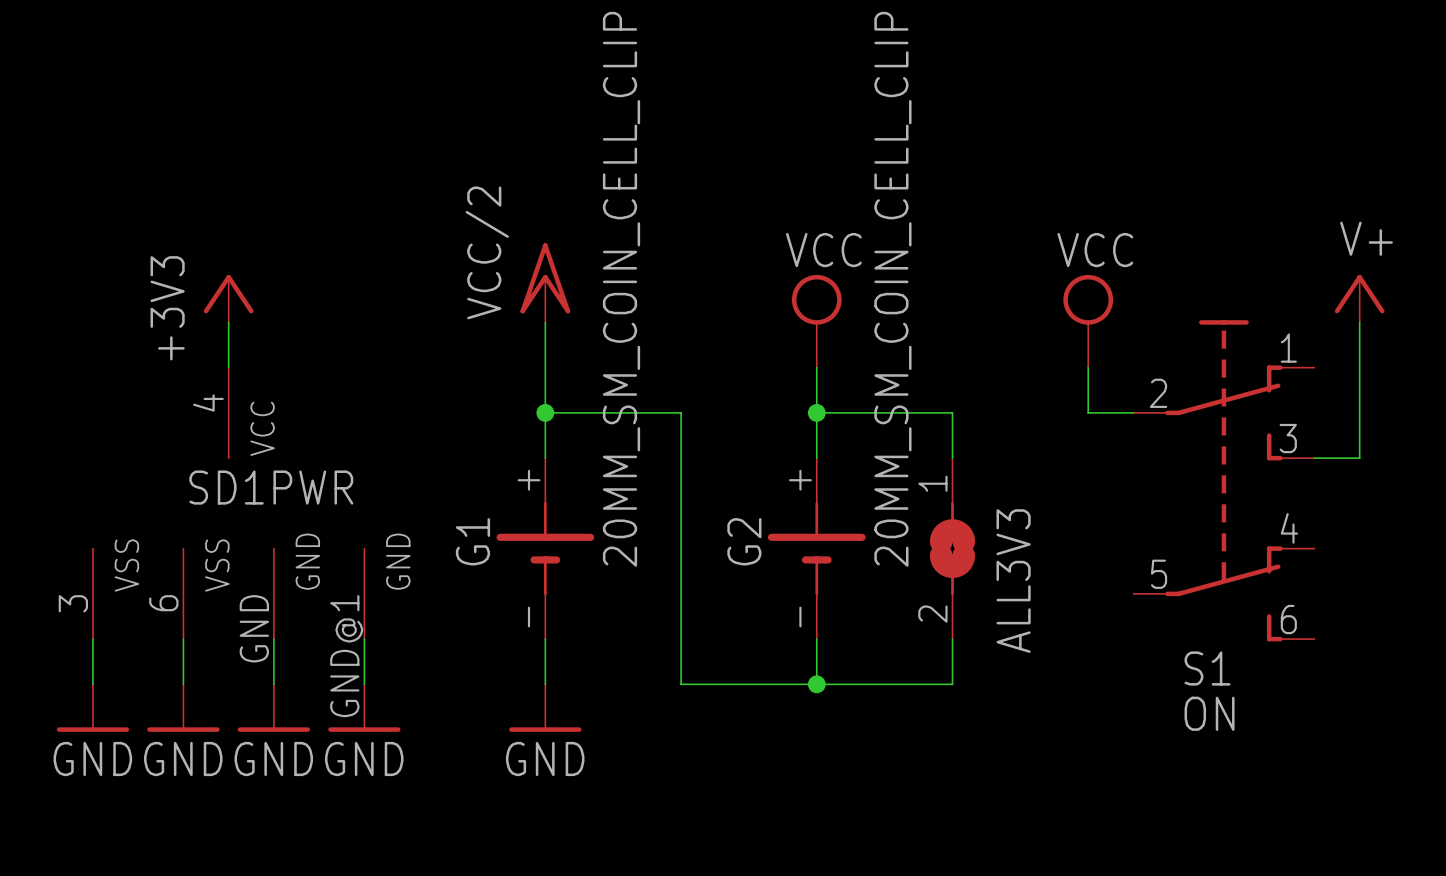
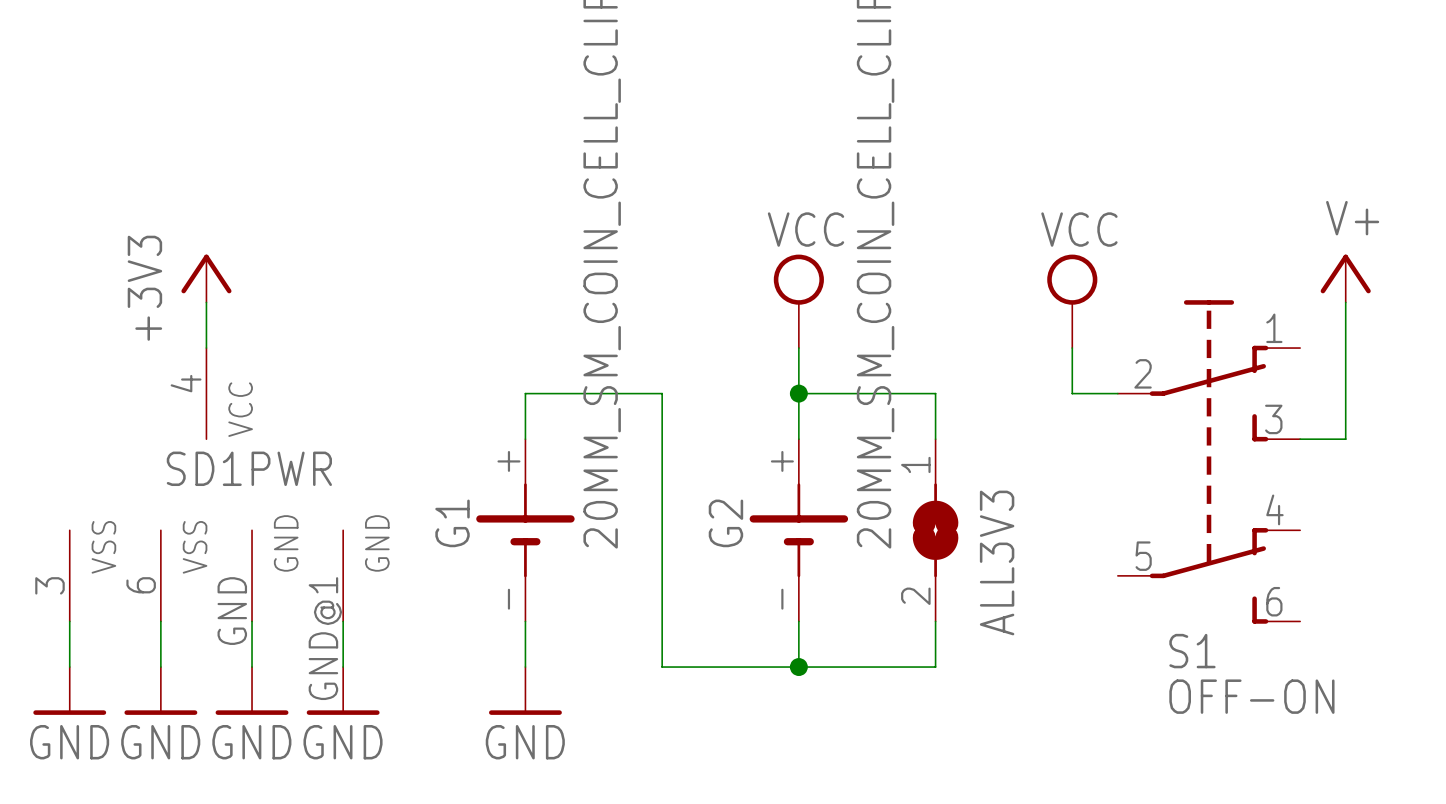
power symbol: VCC/2 (545, 282) -> none
wire: (545, 322) (545, 412) -> none
junction: (545, 412) -> none
S1 value: ON (1209, 713) -> OFF-ON (1251, 696)

